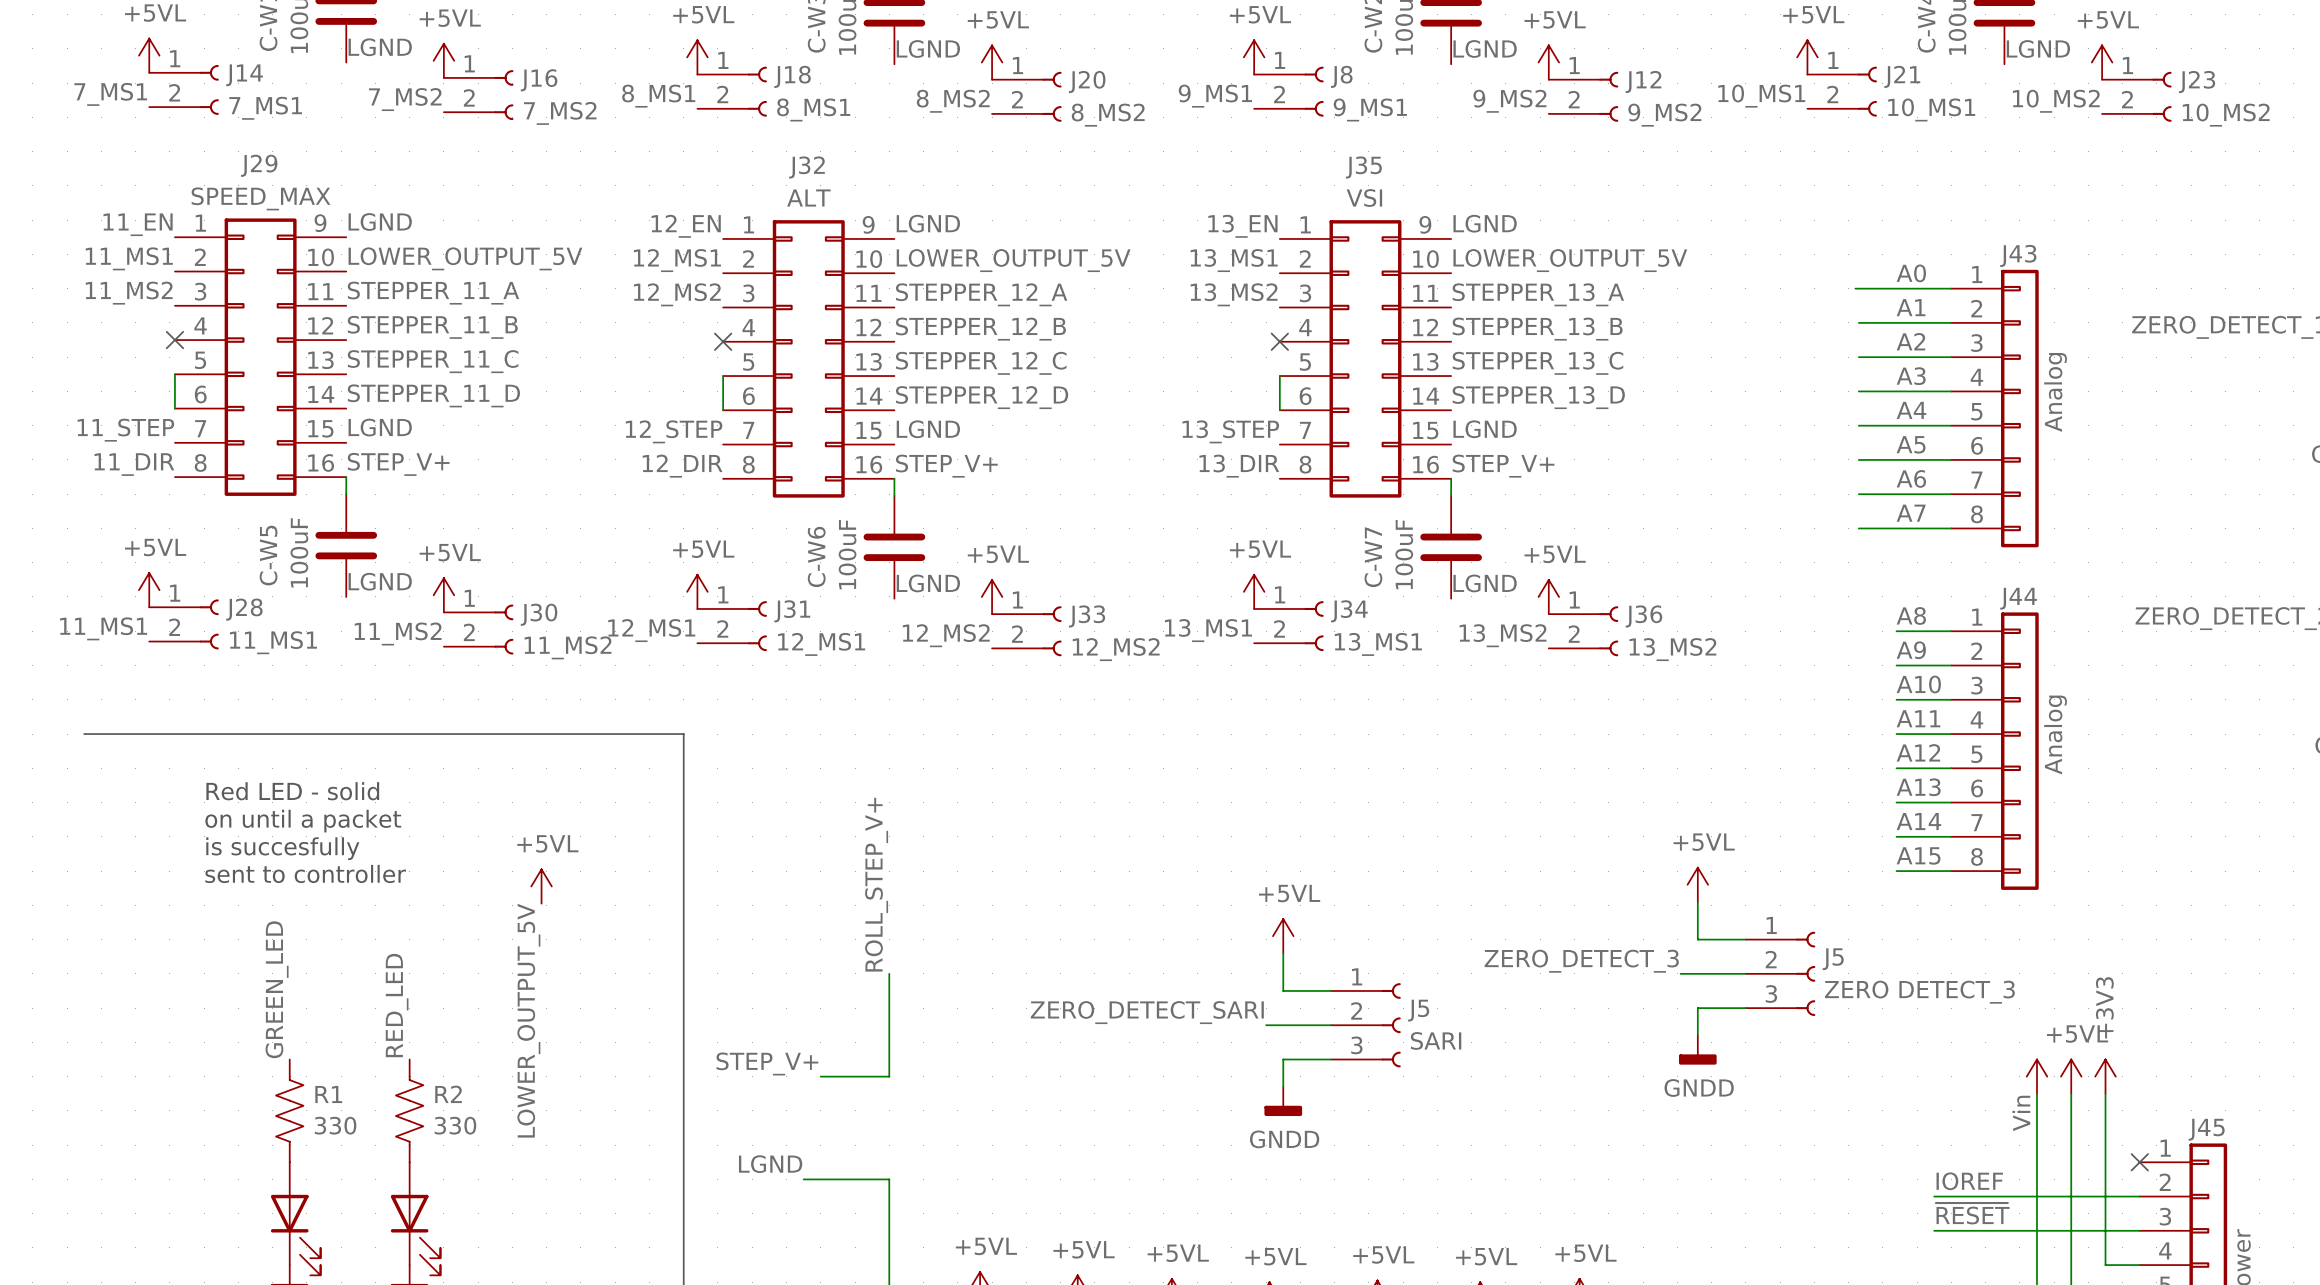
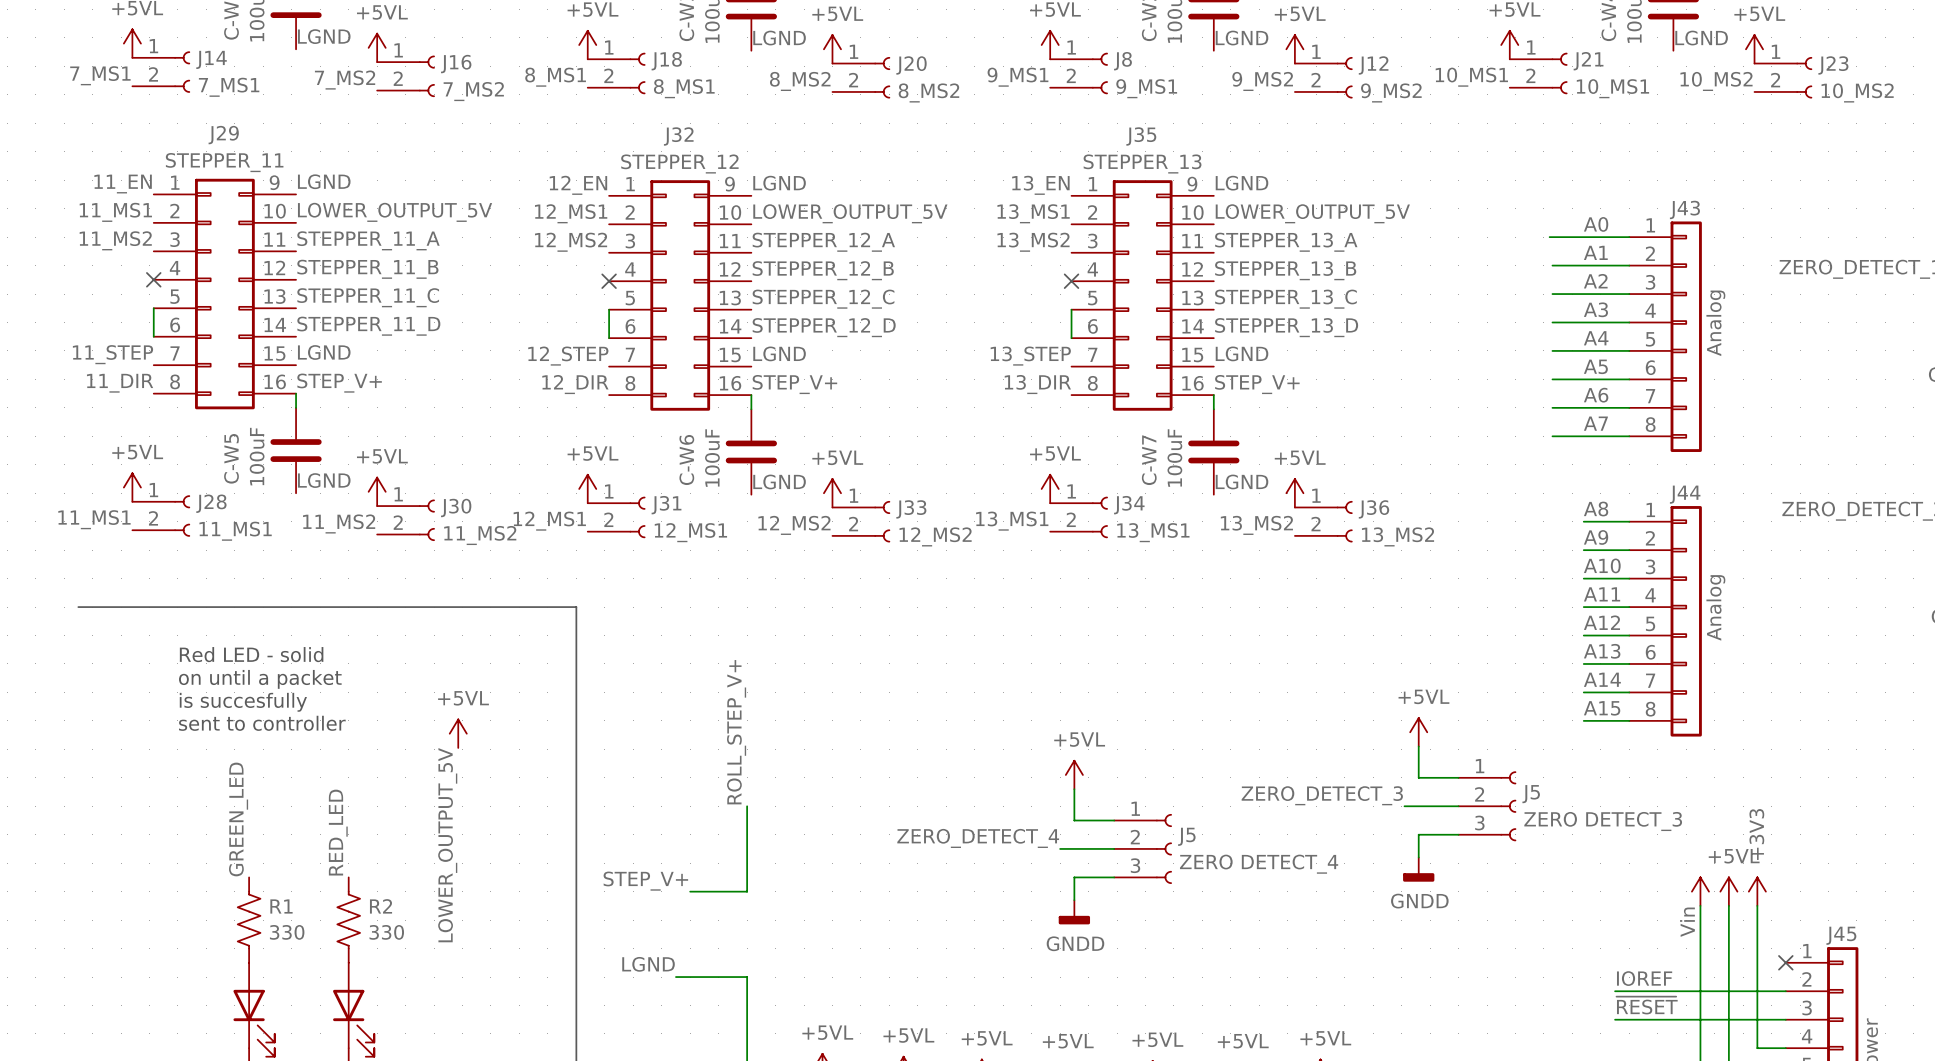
J29 value: SPEED_MAX (261, 198) -> STEPPER_11 (224, 162)
J32 value: ALT (808, 198) -> STEPPER_12 (679, 163)
J35 value: VSI (1364, 198) -> STEPPER_13 (1142, 163)
label: ZERO_DETECT_SARI (1147, 1012) -> ZERO_DETECT_4 (978, 838)
J5 value: SARI (1436, 1040) -> ZERO DETECT_4 (1259, 864)

